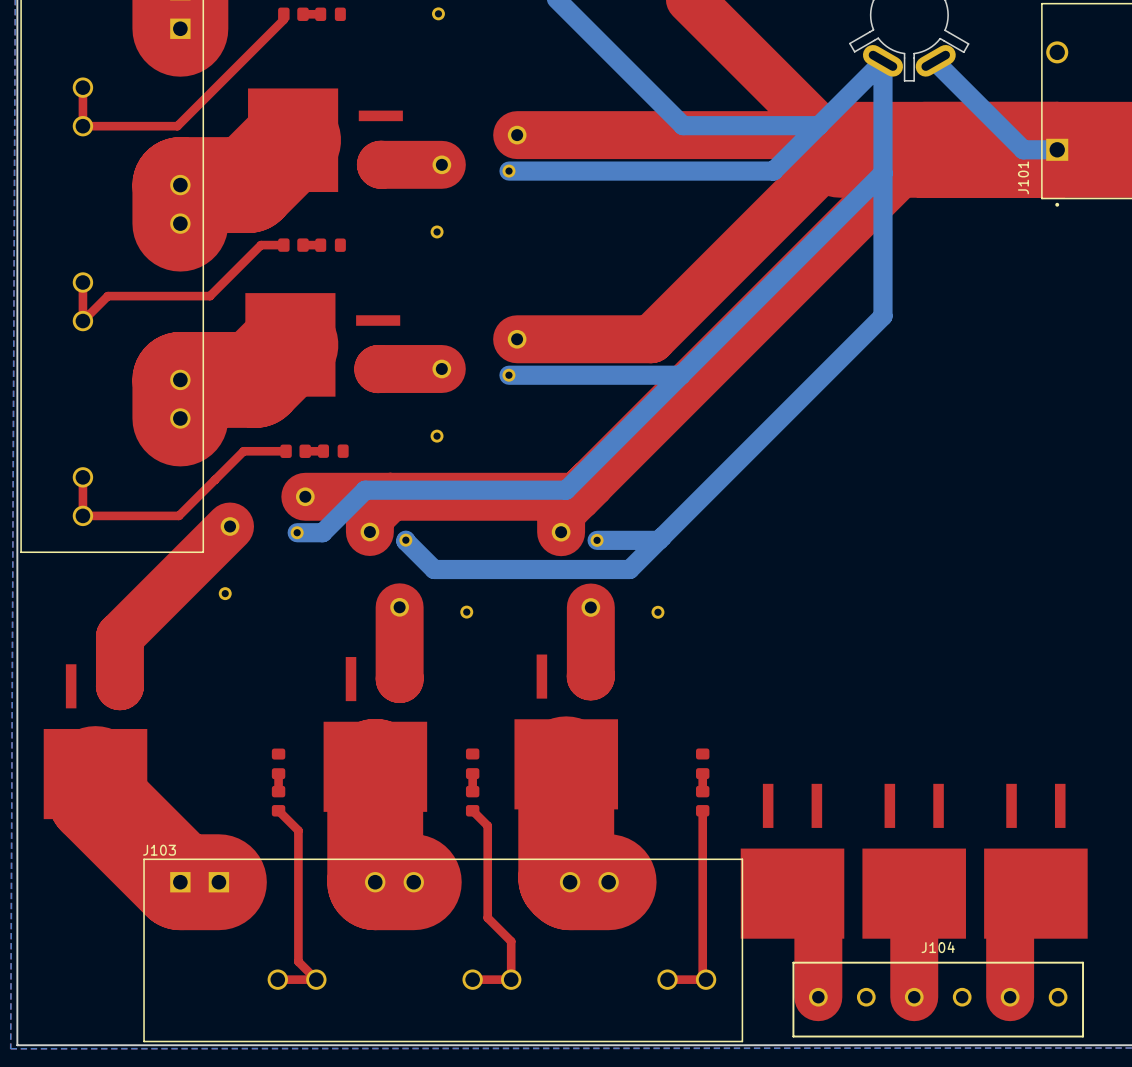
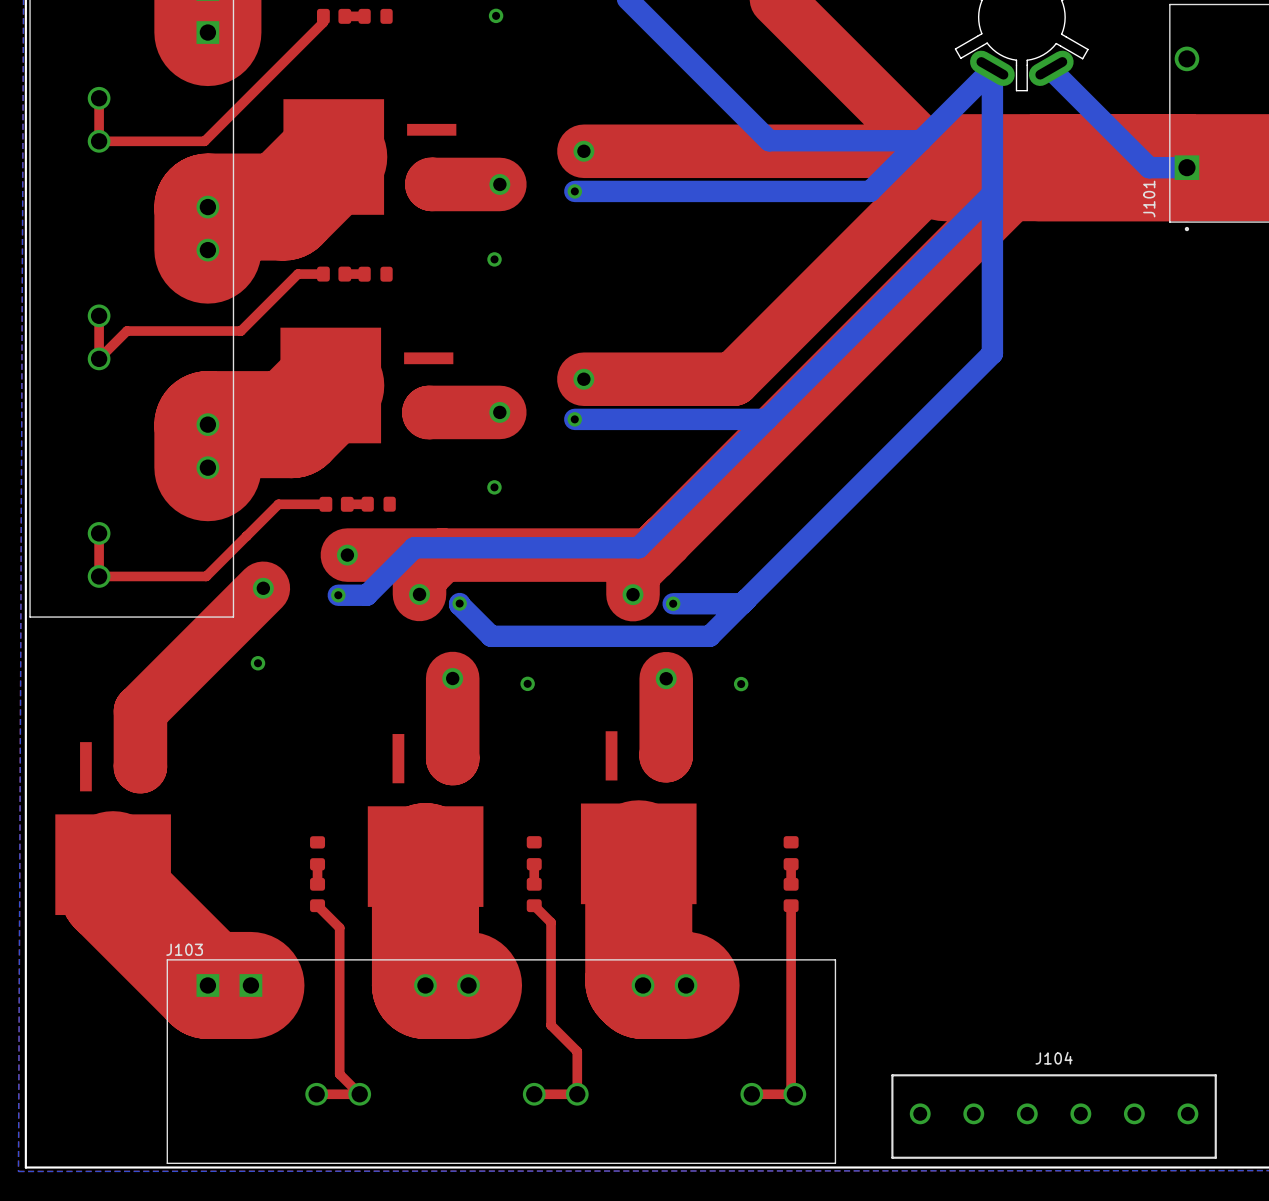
part: (792, 861) -> none
part: (914, 861) -> none
part: (1035, 861) -> none
top track: (792, 893) (818, 919) (818, 997) -> none
top track: (914, 893) (914, 997) -> none
top track: (1035, 893) (1010, 919) (1010, 997) -> none

